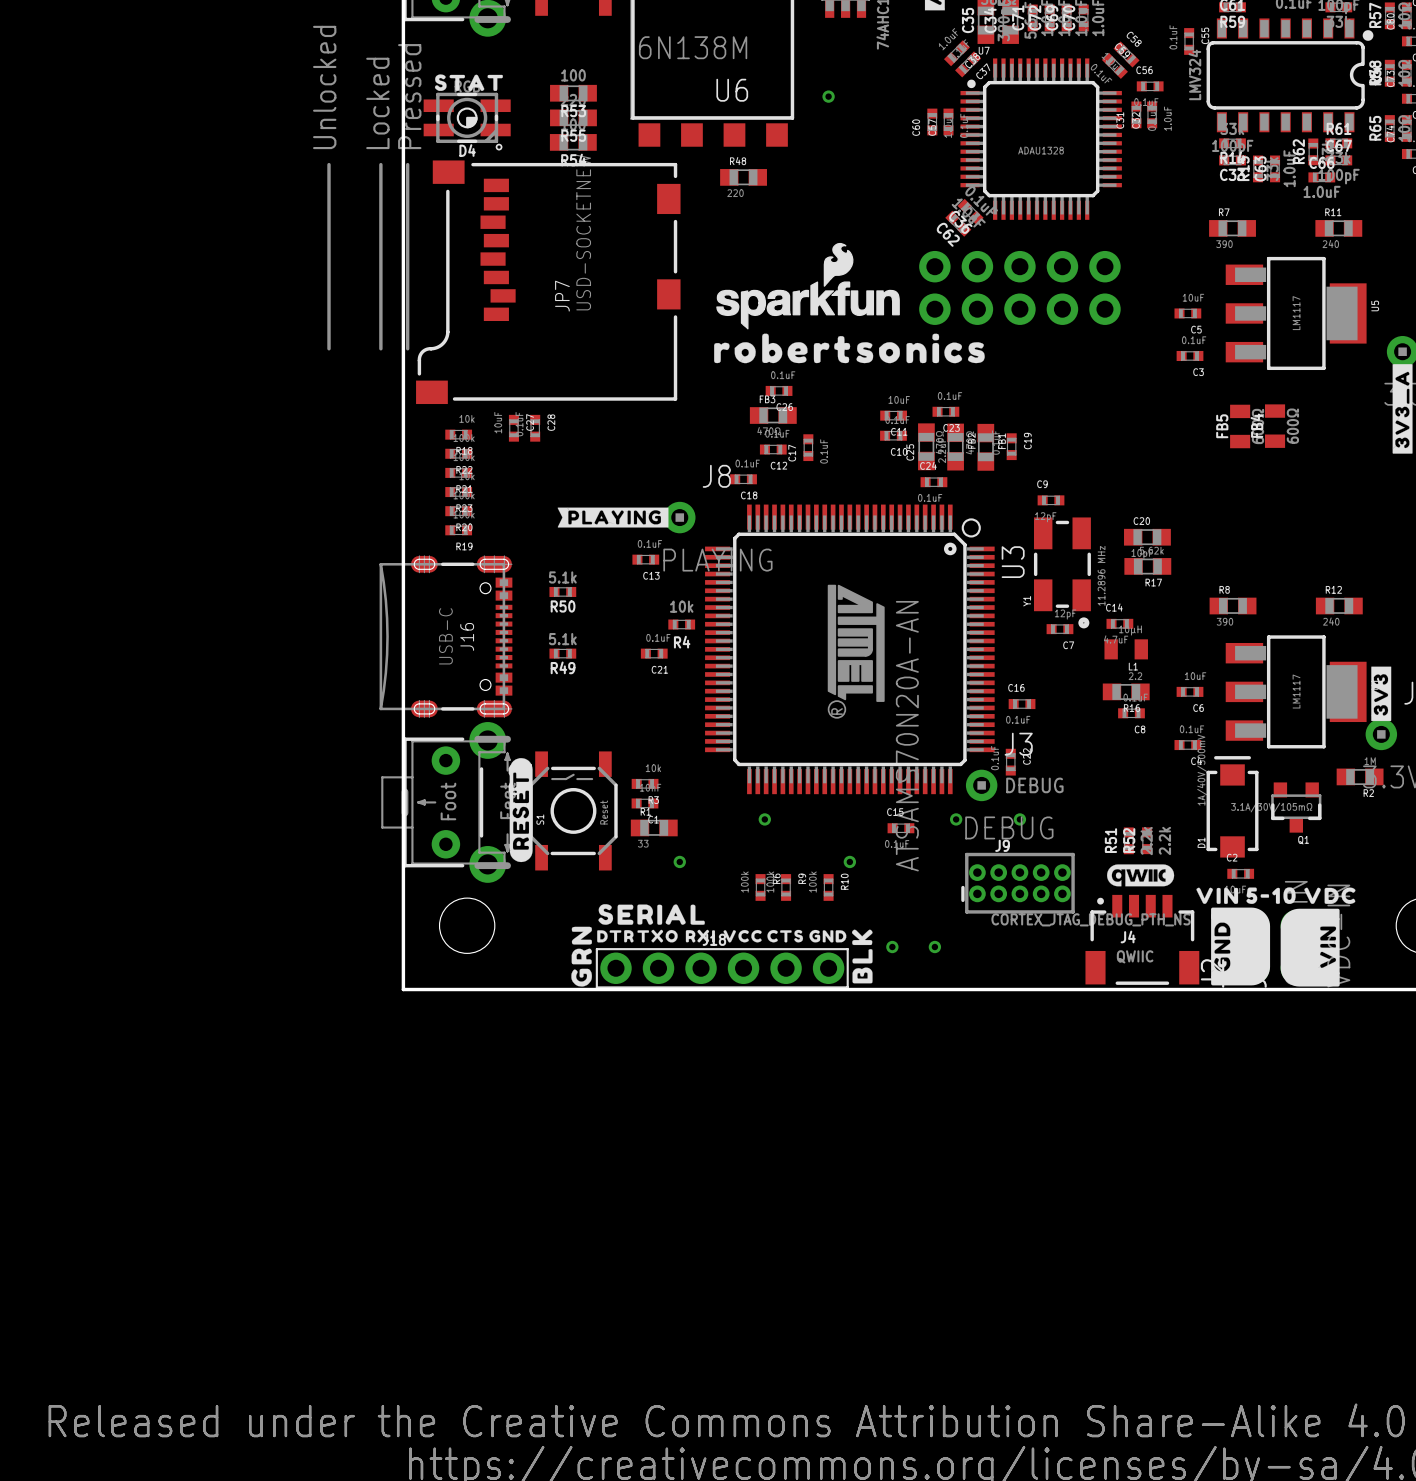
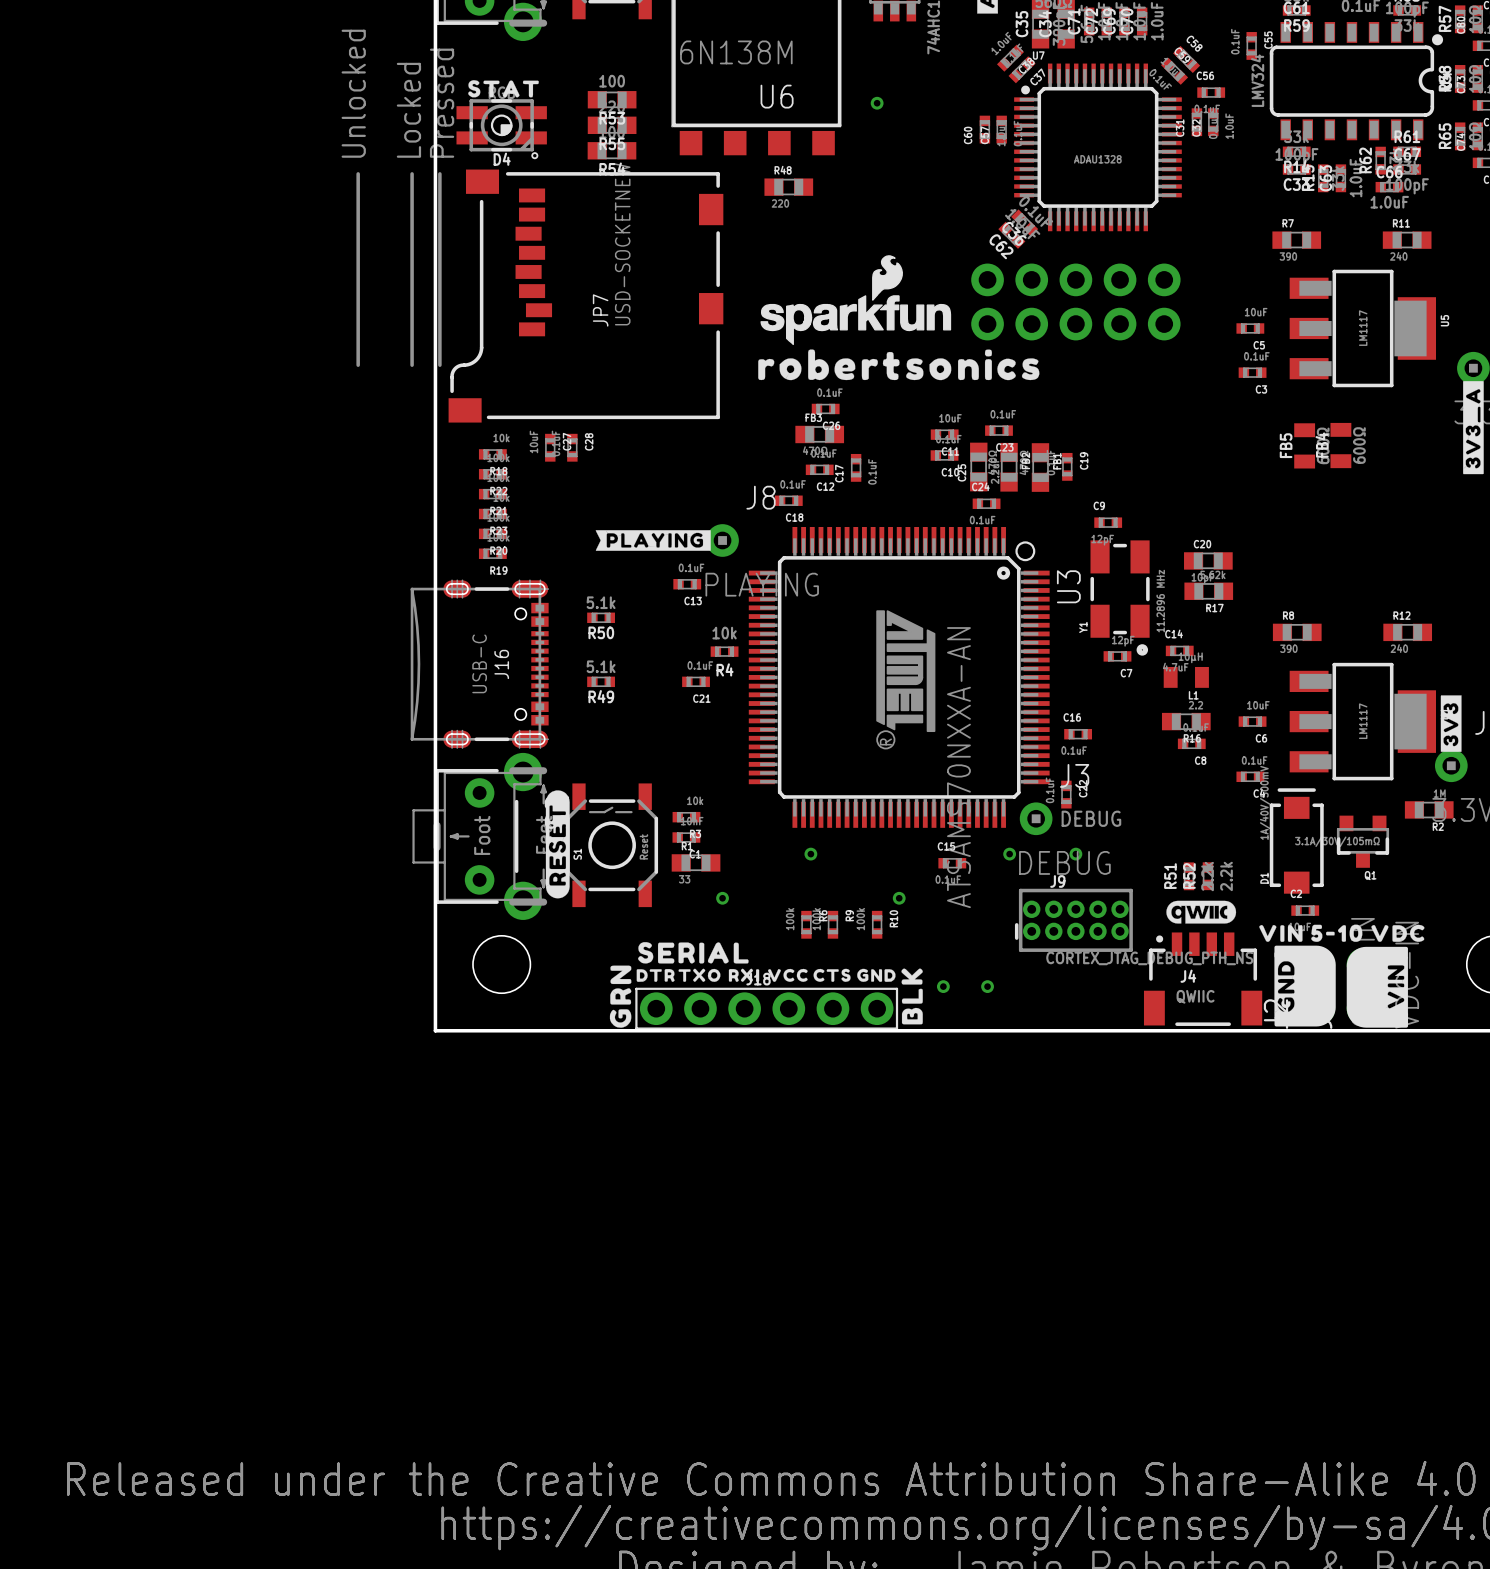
U3 value: ATSAMS70N20A-AN (907, 736) -> ATSAMS70NXXA-AN (958, 767)

